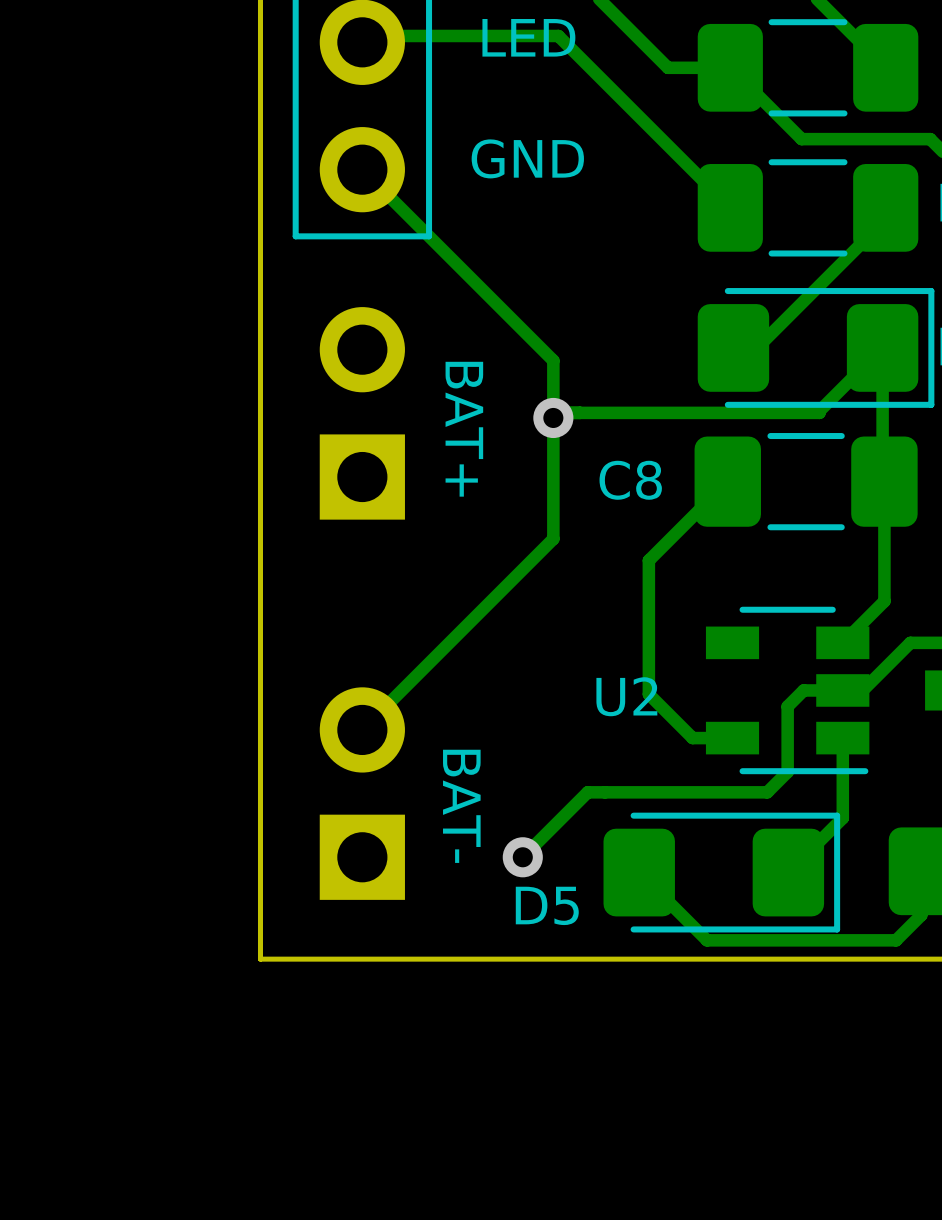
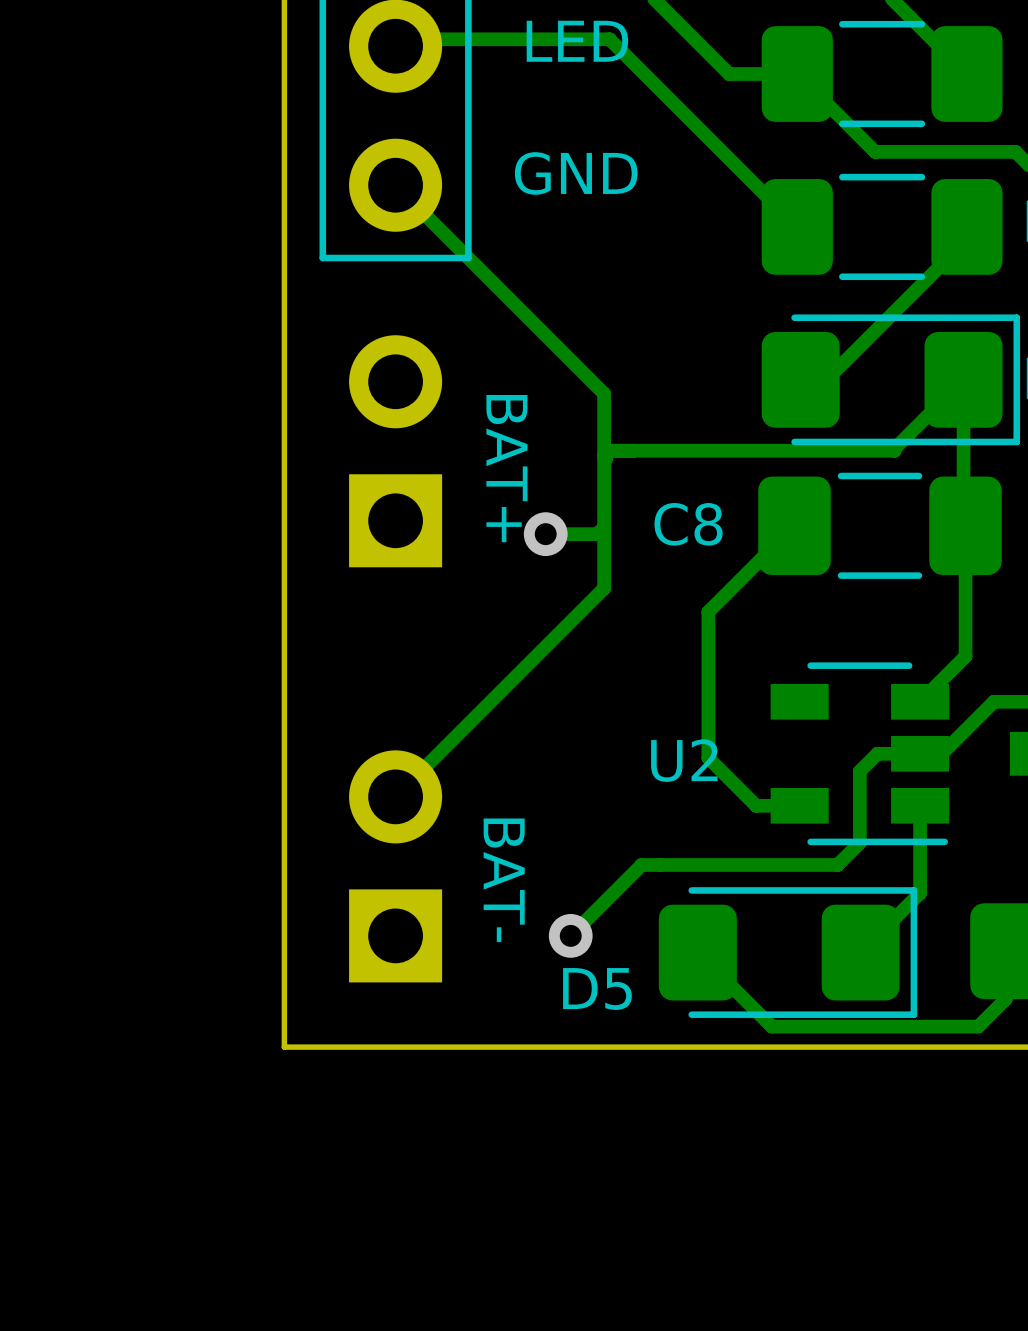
via position: (553, 417) -> (545, 534)
track: none -> (604, 527) (597, 534) (545, 534)

